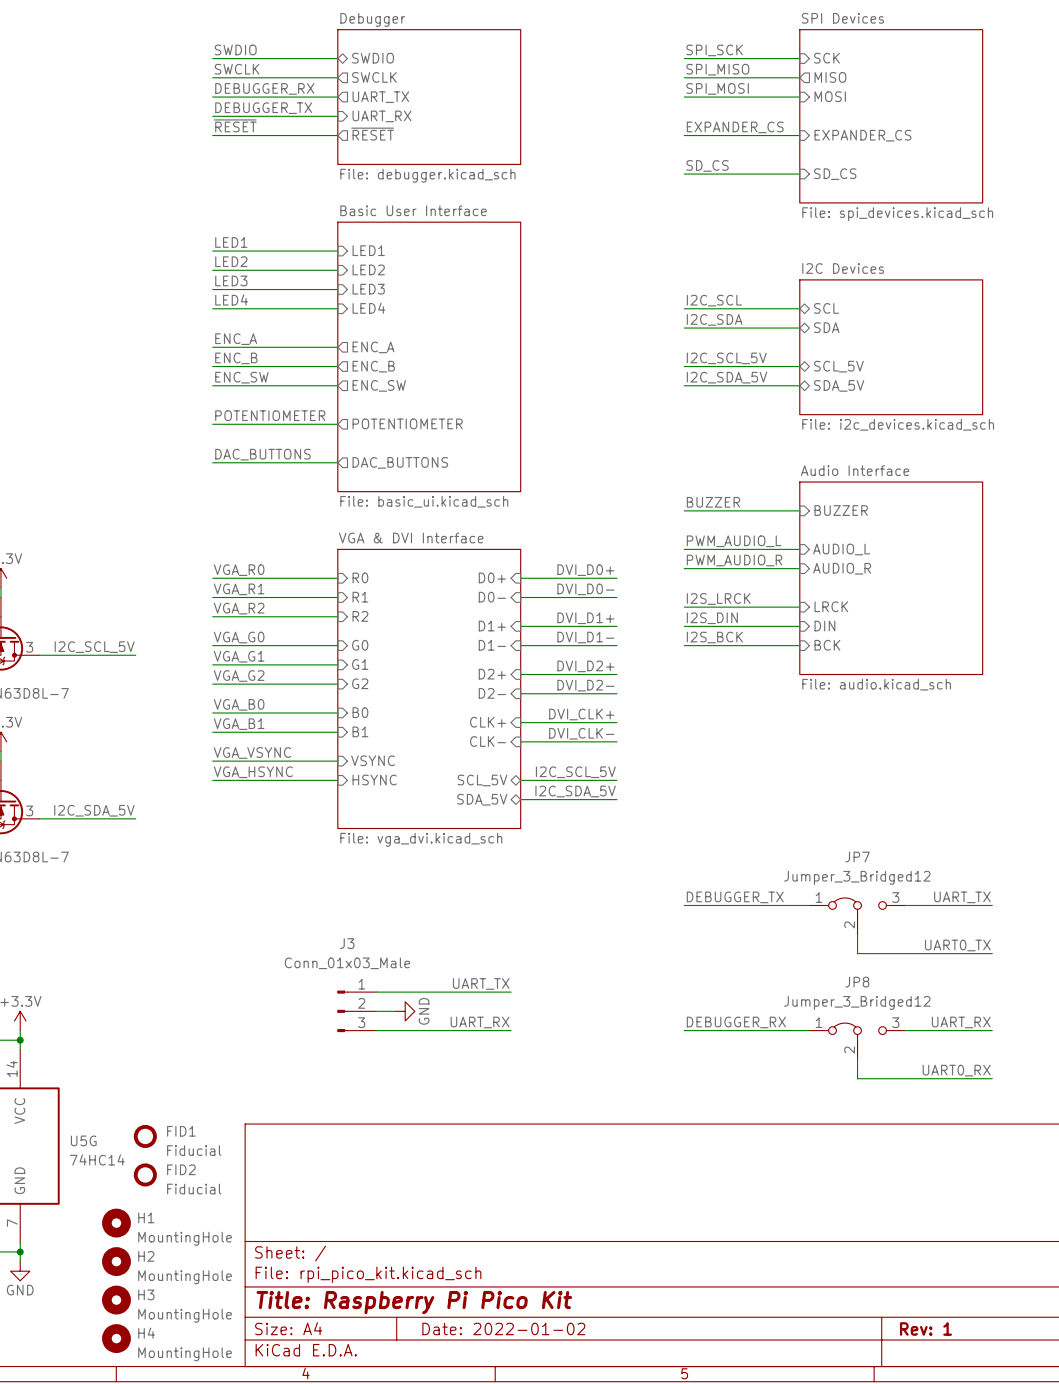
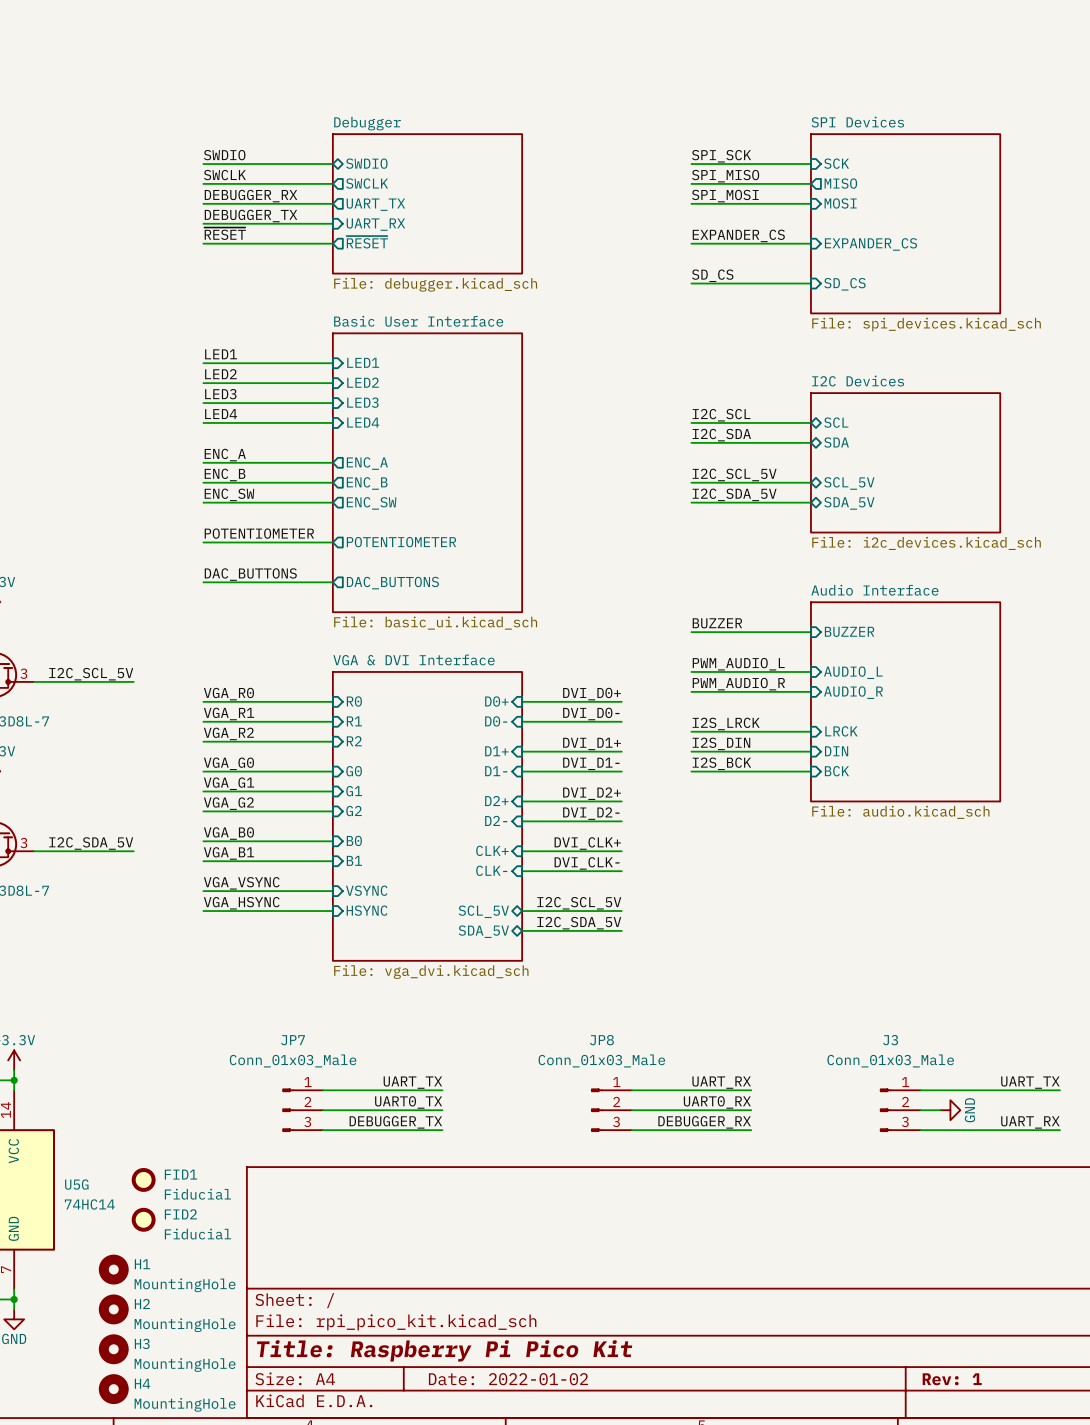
label position: SWDIO (235, 49) -> SWDIO (224, 155)
label position: SPI_SCK (714, 50) -> SPI_SCK (721, 156)
wire: (212, 58) (337, 58) -> (203, 164) (332, 164)
sheet pin position: SWDIO (373, 58) -> SWDIO (366, 163)
wire: (684, 58) (799, 58) -> (691, 164) (810, 164)
sheet pin position: SCK (826, 58) -> SCK (836, 163)
label position: SWCLK (237, 69) -> SWCLK (224, 175)
label position: SPI_MISO (717, 69) -> SPI_MISO (725, 176)
wire: (212, 77) (337, 77) -> (203, 183) (332, 183)
sheet pin position: SWCLK (374, 77) -> SWCLK (367, 183)
wire: (684, 77) (799, 77) -> none
sheet pin position: MISO (830, 77) -> MISO (840, 183)
label position: DEBUGGER_RX (264, 88) -> DEBUGGER_RX (250, 196)
label position: SPI_MOSI (717, 88) -> SPI_MOSI (725, 196)
sheet pin position: MOSI (830, 96) -> MOSI (840, 203)
wire: (212, 97) (337, 97) -> (203, 203) (332, 203)
sheet pin position: UART_TX (380, 97) -> UART_TX (375, 204)
sheet Debugger position: (429, 97) -> (427, 203)
wire: (684, 97) (799, 97) -> (691, 203) (810, 203)
label position: DEBUGGER_TX (263, 108) -> DEBUGGER_TX (250, 216)
wire: (212, 116) (337, 116) -> (203, 223) (332, 223)
sheet pin position: UART_RX (381, 116) -> UART_RX (375, 224)
sheet SPI Devices position: (891, 116) -> (905, 223)
label position: ~{RESET} (235, 125) -> ~{RESET} (225, 233)
label position: EXPANDER_CS (735, 127) -> EXPANDER_CS (738, 235)
sheet pin position: ~{RESET} (372, 134) -> ~{RESET} (367, 242)
wire: (212, 135) (337, 135) -> (203, 243) (332, 243)
wire: (684, 135) (799, 135) -> (691, 243) (810, 243)
sheet pin position: EXPANDER_CS (862, 135) -> EXPANDER_CS (870, 244)
label position: SD_CS (707, 165) -> SD_CS (712, 275)
wire: (790, 174) (799, 174) -> (691, 183) (701, 183)
sheet pin position: SD_CS (835, 174) -> SD_CS (844, 284)
label position: LED1 (231, 242) -> LED1 (221, 354)
sheet pin position: LED1 (368, 250) -> LED1 (363, 362)
wire: (212, 251) (337, 251) -> none
label position: LED2 (231, 261) -> LED2 (220, 374)
sheet pin position: LED2 (368, 269) -> LED2 (363, 382)
wire: (212, 270) (337, 270) -> (203, 462) (332, 462)
wire: none -> (691, 283) (810, 283)
label position: LED3 (231, 280) -> LED3 (220, 394)
wire: (212, 289) (337, 289) -> none
sheet pin position: LED3 (368, 289) -> LED3 (362, 402)
label position: LED4 (231, 299) -> LED4 (221, 414)
label position: I2C_SCL (714, 300) -> I2C_SCL (721, 415)
wire: (212, 308) (337, 308) -> (203, 422) (332, 422)
sheet pin position: LED4 (368, 308) -> LED4 (363, 422)
wire: (684, 308) (799, 308) -> (691, 422) (810, 422)
sheet pin position: SCL (826, 308) -> SCL (836, 422)
label position: I2C_SDA (714, 319) -> I2C_SDA (721, 435)
sheet pin position: SDA (826, 327) -> SDA (836, 442)
wire: (684, 328) (799, 328) -> (691, 442) (810, 442)
label position: ENC_A (236, 339) -> ENC_A (225, 455)
wire: (328, 347) (337, 347) -> (203, 363) (213, 363)
sheet pin position: ENC_A (373, 347) -> ENC_A (367, 463)
sheet I2C Devices position: (891, 347) -> (905, 462)
sheet Basic User Interface position: (429, 356) -> (427, 472)
label position: ENC_B (236, 358) -> ENC_B (225, 474)
label position: I2C_SCL_5V (726, 358) -> I2C_SCL_5V (734, 474)
wire: (328, 366) (337, 366) -> (203, 383) (213, 383)
sheet pin position: ENC_B (373, 366) -> ENC_B (367, 483)
wire: (684, 366) (799, 366) -> (691, 482) (810, 482)
sheet pin position: SCL_5V (838, 366) -> SCL_5V (849, 483)
label position: ENC_SW (241, 377) -> ENC_SW (229, 494)
label position: I2C_SDA_5V (726, 377) -> I2C_SDA_5V (734, 494)
wire: (328, 385) (337, 385) -> (203, 403) (213, 403)
sheet pin position: ENC_SW (379, 385) -> ENC_SW (371, 503)
wire: (684, 385) (799, 385) -> (691, 502) (810, 502)
sheet pin position: SDA_5V (839, 385) -> SDA_5V (849, 503)
label position: POTENTIOMETER (270, 415) -> POTENTIOMETER (259, 533)
sheet pin position: POTENTIOMETER (407, 423) -> POTENTIOMETER (401, 542)
wire: (212, 424) (337, 424) -> (203, 542) (332, 542)
label position: DAC_BUTTONS (262, 454) -> DAC_BUTTONS (250, 574)
wire: (328, 462) (337, 462) -> (203, 482) (213, 482)
sheet pin position: DAC_BUTTONS (400, 462) -> DAC_BUTTONS (392, 583)
wire: none -> (203, 502) (332, 502)
label position: BUZZER (713, 502) -> BUZZER (717, 623)
wire: (684, 510) (799, 510) -> none
sheet pin position: BUZZER (841, 510) -> BUZZER (849, 631)
label position: PWM_AUDIO_L (734, 541) -> PWM_AUDIO_L (738, 664)
wire: (684, 549) (799, 549) -> (691, 731) (810, 731)
sheet pin position: AUDIO_L (841, 549) -> AUDIO_L (853, 672)
label position: PWM_AUDIO_R (734, 560) -> PWM_AUDIO_R (738, 684)
wire: (684, 568) (799, 568) -> (691, 691) (810, 691)
sheet pin position: AUDIO_R (842, 568) -> AUDIO_R (853, 692)
label position: VGA_R0 (239, 570) -> VGA_R0 (228, 694)
label position: DVI_D0+ (585, 570) -> DVI_D0+ (592, 694)
sheet pin position: R0 (360, 577) -> R0 (354, 701)
sheet pin position: D0+ (492, 577) -> D0+ (496, 701)
wire: (212, 578) (337, 578) -> (203, 701) (332, 701)
wire: (520, 578) (616, 578) -> none
sheet Audio Interface position: (891, 578) -> (905, 701)
label position: VGA_R1 (239, 589) -> VGA_R1 (229, 714)
label position: DVI_D0- (585, 589) -> DVI_D0- (591, 714)
wire: (212, 597) (337, 597) -> (203, 721) (332, 721)
sheet pin position: R1 (360, 597) -> R1 (354, 721)
sheet pin position: D0- (492, 597) -> D0- (496, 721)
wire: (520, 597) (616, 597) -> (522, 801) (621, 801)
label position: I2S_LRCK (718, 599) -> I2S_LRCK (726, 723)
sheet pin position: LRCK (831, 606) -> LRCK (841, 731)
wire: (790, 607) (799, 607) -> (691, 632) (701, 632)
label position: VGA_R2 (239, 608) -> VGA_R2 (228, 733)
wire: (212, 616) (337, 616) -> (203, 582) (332, 582)
sheet pin position: R2 (360, 616) -> R2 (354, 741)
label position: DVI_D1+ (585, 618) -> DVI_D1+ (592, 743)
label position: I2S_DIN (712, 618) -> I2S_DIN (721, 743)
sheet pin position: D1+ (492, 626) -> D1+ (496, 751)
wire: (520, 626) (616, 626) -> (522, 821) (621, 821)
wire: (684, 626) (799, 626) -> (691, 751) (810, 751)
sheet pin position: DIN (824, 626) -> DIN (836, 751)
label position: VGA_G0 (239, 637) -> VGA_G0 (228, 763)
label position: DVI_D1- (585, 637) -> DVI_D1- (591, 763)
label position: I2S_BCK (714, 637) -> I2S_BCK (721, 763)
wire: (212, 645) (337, 645) -> (203, 771) (332, 771)
sheet pin position: G0 (360, 645) -> G0 (354, 771)
sheet pin position: D1- (492, 645) -> D1- (496, 771)
wire: (520, 645) (616, 645) -> (522, 851) (621, 851)
wire: (790, 645) (799, 645) -> (691, 671) (701, 671)
sheet pin position: BCK (827, 645) -> BCK (836, 771)
label position: VGA_G1 (239, 656) -> VGA_G1 (229, 783)
wire: (212, 664) (337, 664) -> (203, 841) (332, 841)
sheet pin position: G1 (360, 664) -> G1 (354, 791)
label position: DVI_D2+ (585, 666) -> DVI_D2+ (592, 793)
sheet pin position: D2+ (492, 674) -> D2+ (496, 801)
wire: (607, 674) (616, 674) -> (522, 701) (532, 701)
label position: VGA_G2 (239, 676) -> VGA_G2 (228, 803)
sheet pin position: G2 (360, 683) -> G2 (354, 811)
wire: (212, 684) (337, 684) -> (203, 891) (332, 891)
label position: DVI_D2- (585, 685) -> DVI_D2- (591, 813)
sheet VGA & DVI Interface position: (429, 688) -> (427, 816)
sheet pin position: D2- (492, 693) -> D2- (496, 820)
wire: (607, 693) (616, 693) -> (522, 721) (532, 721)
label position: VGA_B0 (239, 704) -> VGA_B0 (228, 833)
sheet pin position: B0 (360, 712) -> B0 (354, 840)
wire: (328, 713) (337, 713) -> (203, 741) (213, 741)
label position: DVI_CLK+ (581, 714) -> DVI_CLK+ (587, 843)
sheet pin position: CLK+ (488, 722) -> CLK+ (492, 850)
wire: (607, 722) (616, 722) -> (522, 751) (532, 751)
label position: VGA_B1 (239, 724) -> VGA_B1 (229, 853)
sheet pin position: B1 (360, 731) -> B1 (354, 860)
wire: (212, 732) (337, 732) -> (203, 861) (332, 861)
label position: DVI_CLK- (581, 733) -> DVI_CLK- (587, 863)
sheet pin position: CLK- (488, 741) -> CLK- (491, 870)
wire: (607, 741) (616, 741) -> (522, 771) (532, 771)
wire: none -> (691, 771) (810, 771)
label position: VGA_VSYNC (252, 752) -> VGA_VSYNC (241, 883)
sheet pin position: VSYNC (373, 760) -> VSYNC (366, 890)
wire: (328, 761) (337, 761) -> (203, 791) (213, 791)
label position: VGA_HSYNC (253, 772) -> VGA_HSYNC (241, 903)
label position: I2C_SCL_5V (575, 772) -> I2C_SCL_5V (579, 903)
wire: (328, 780) (337, 780) -> (203, 811) (213, 811)
sheet pin position: HSYNC (374, 780) -> HSYNC (367, 910)
sheet pin position: SCL_5V (482, 780) -> SCL_5V (483, 911)
wire: (520, 780) (616, 780) -> (522, 911) (621, 911)
label position: I2C_SDA_5V (575, 791) -> I2C_SDA_5V (579, 923)
sheet pin position: SDA_5V (482, 799) -> SDA_5V (483, 931)
wire: (520, 799) (616, 799) -> (522, 930) (621, 930)
wire: none -> (522, 871) (621, 871)
wire: none -> (203, 911) (332, 911)
JP7 value: Jumper_3_Bridged12 (857, 877) -> Conn_01x03_Male (293, 1060)
label: DEBUGGER_TX (735, 897) -> none
JP7 symbol: [809, 897, 906, 935] -> [282, 1088, 323, 1132]
label position: UART_TX (962, 897) -> UART_TX (1030, 1082)
wire: (684, 905) (809, 905) -> none
wire: (905, 905) (992, 905) -> none
wire: (857, 934) (857, 953) (992, 953) -> none
label: UART0_TX (957, 945) -> none
label position: UART_TX (481, 983) -> UART_TX (412, 1082)
wire: (376, 992) (511, 992) -> none
JP8 value: Jumper_3_Bridged12 (857, 1002) -> Conn_01x03_Male (601, 1060)
J3 position: (356, 1011) -> (900, 1110)
wire: (376, 1011) (395, 1011) -> none
power symbol: GND (405, 1011) -> none
label: UART_RX (480, 1022) -> none
label position: DEBUGGER_RX (736, 1022) -> DEBUGGER_RX (704, 1122)
label position: UART_RX (961, 1022) -> UART_RX (1030, 1122)
JP8 symbol: [809, 1023, 906, 1060] -> [591, 1088, 632, 1132]
wire: (376, 1030) (511, 1030) -> none
wire: (684, 1030) (809, 1030) -> none
wire: (905, 1030) (992, 1030) -> none
label: none -> UART_RX (721, 1082)
wire: none -> (322, 1090) (442, 1090)
wire: none -> (631, 1090) (751, 1090)
wire: none -> (920, 1090) (1059, 1090)
wire: (857, 1059) (857, 1078) (992, 1078) -> none
label: none -> UART0_TX (408, 1102)
label: none -> UART0_RX (717, 1102)
wire: none -> (322, 1110) (442, 1110)
wire: none -> (631, 1110) (751, 1110)
wire: none -> (920, 1110) (940, 1110)
power symbol: none -> GND (950, 1110)
label: UART0_RX (956, 1070) -> none
label: none -> DEBUGGER_TX (395, 1122)
wire: none -> (322, 1130) (442, 1130)
wire: none -> (631, 1130) (751, 1130)
wire: none -> (920, 1130) (1059, 1130)

